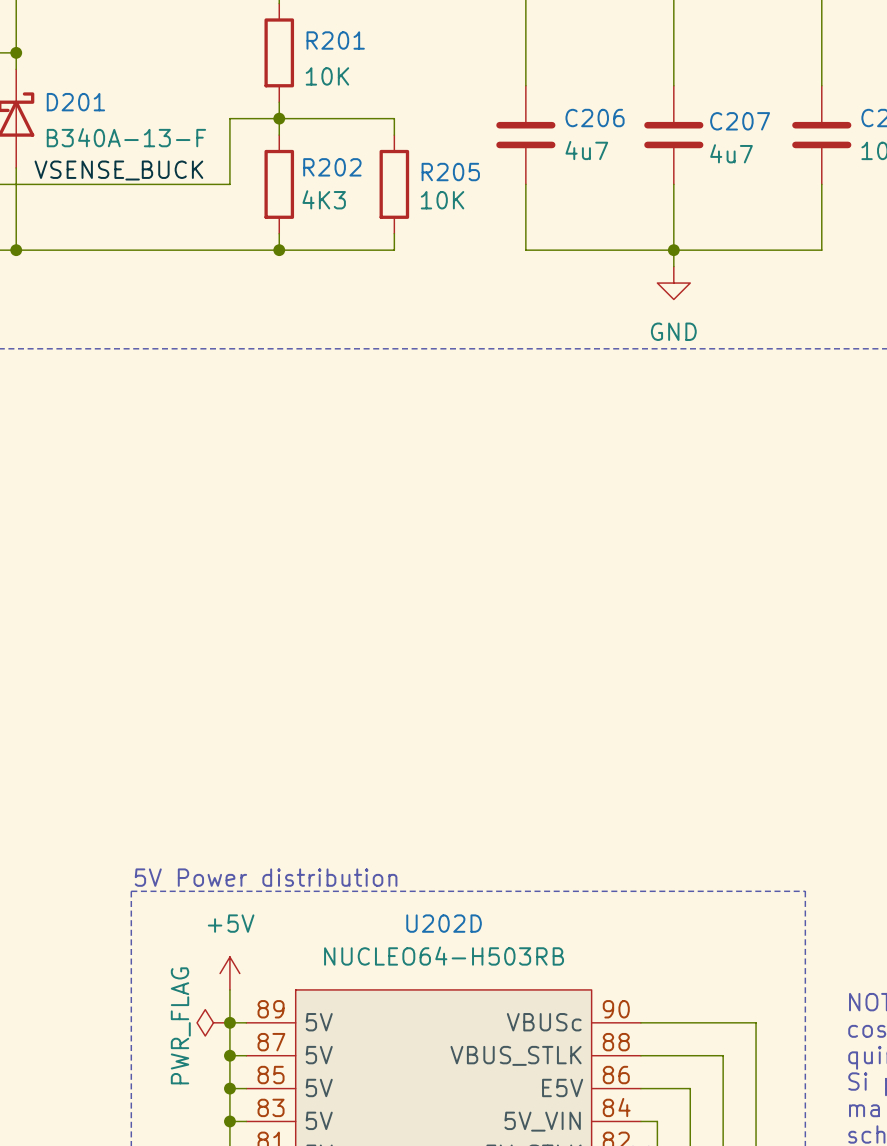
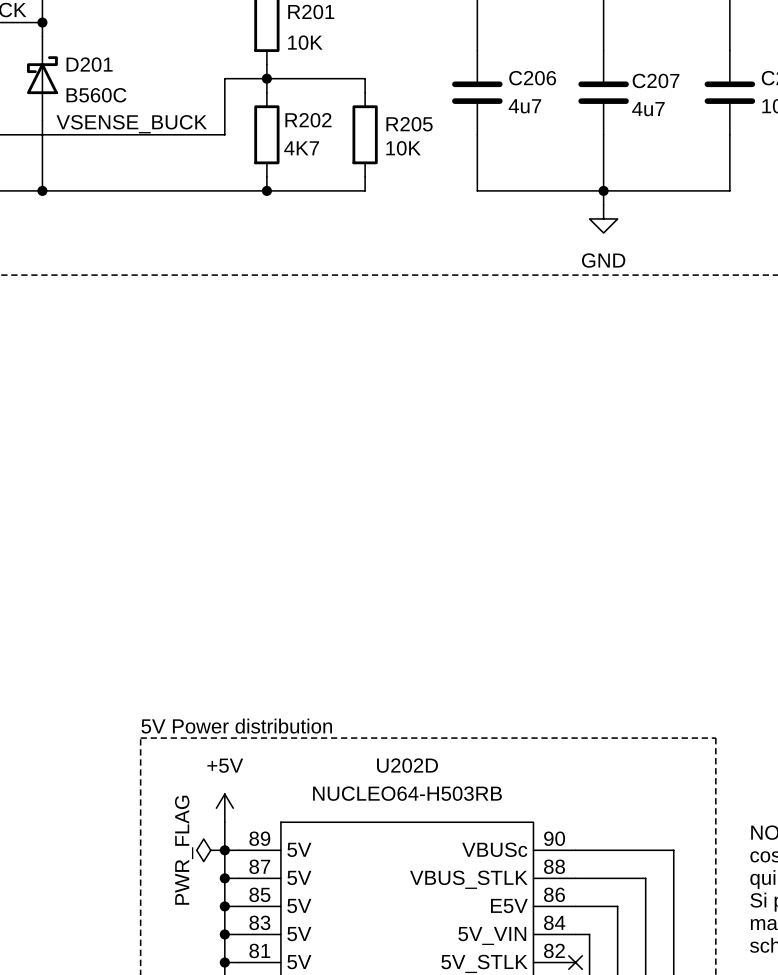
D201 value: B340A-13-F (126, 137) -> B560C (96, 95)
R202 value: 4K3 (324, 199) -> 4K7 (301, 148)

